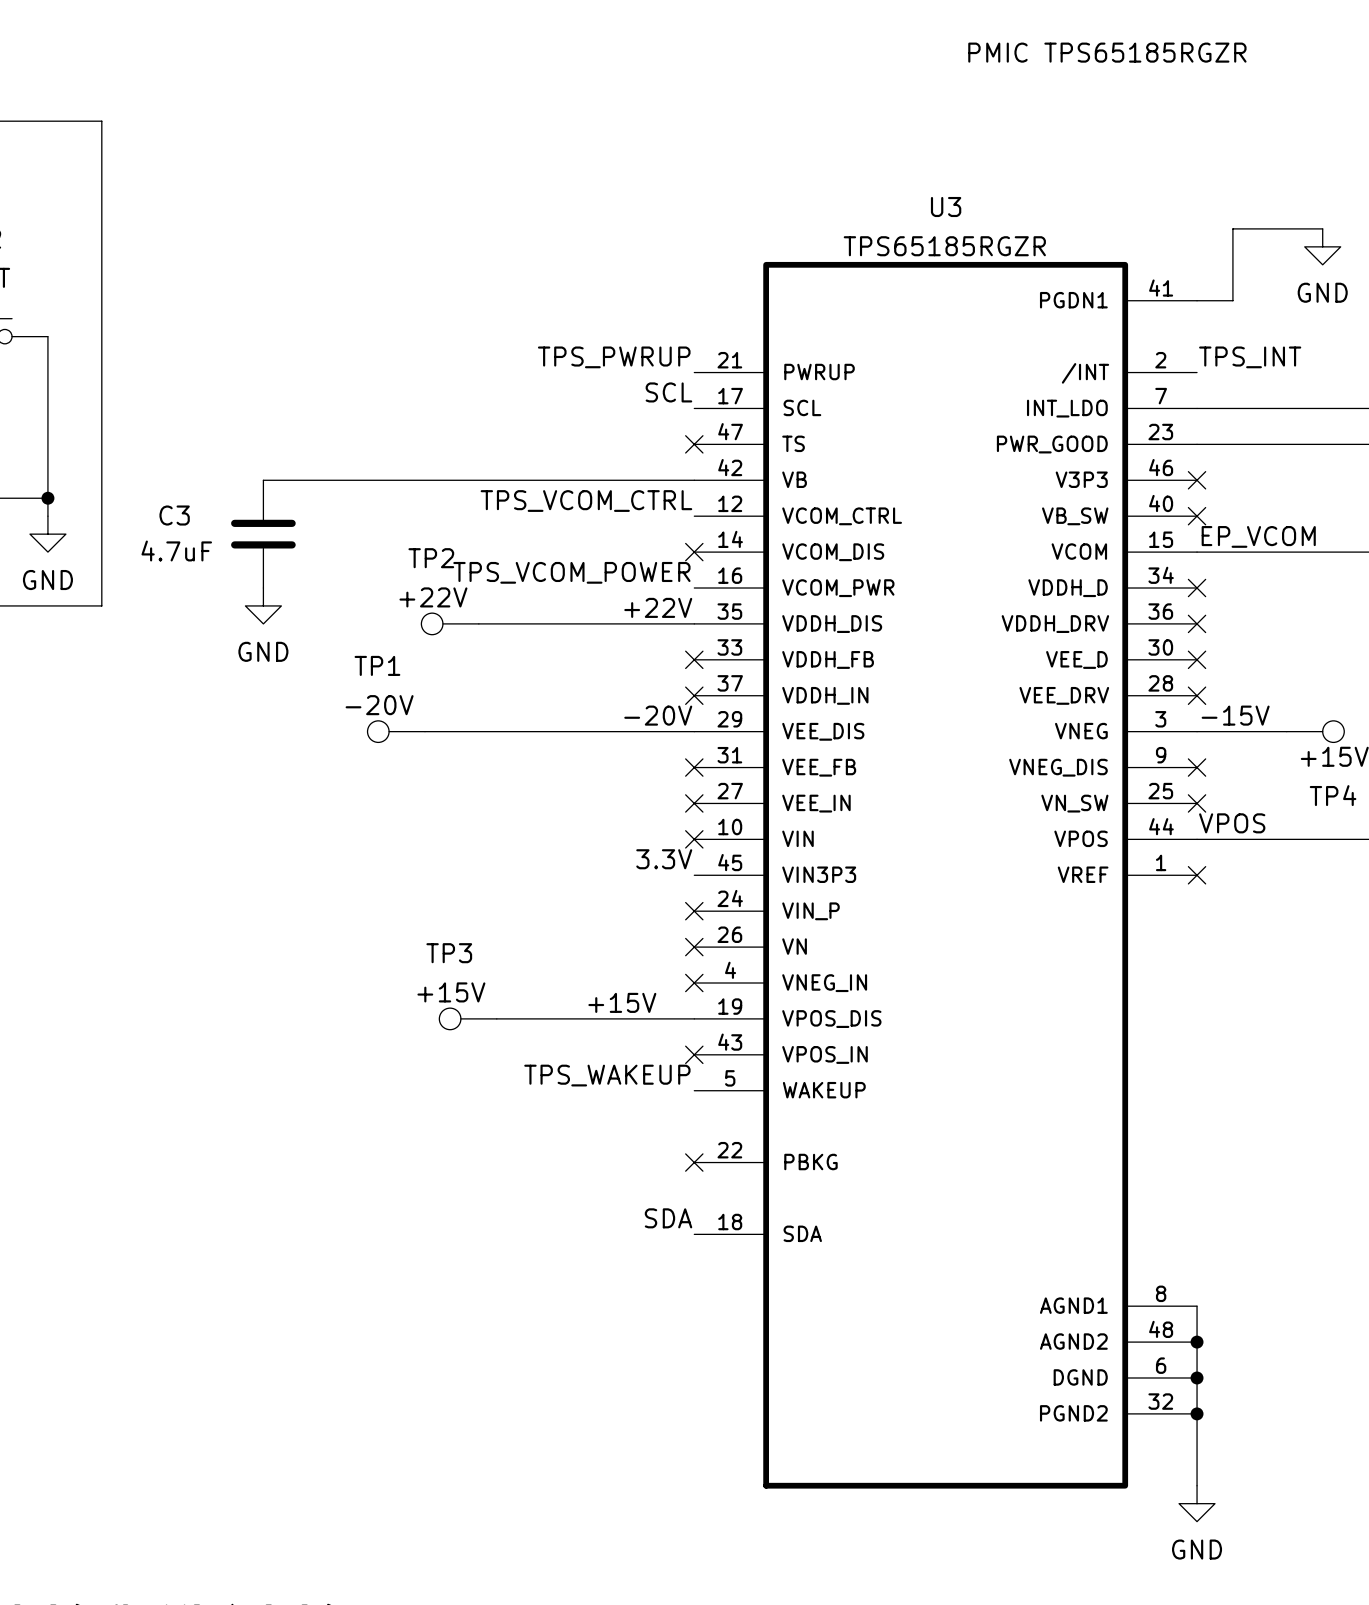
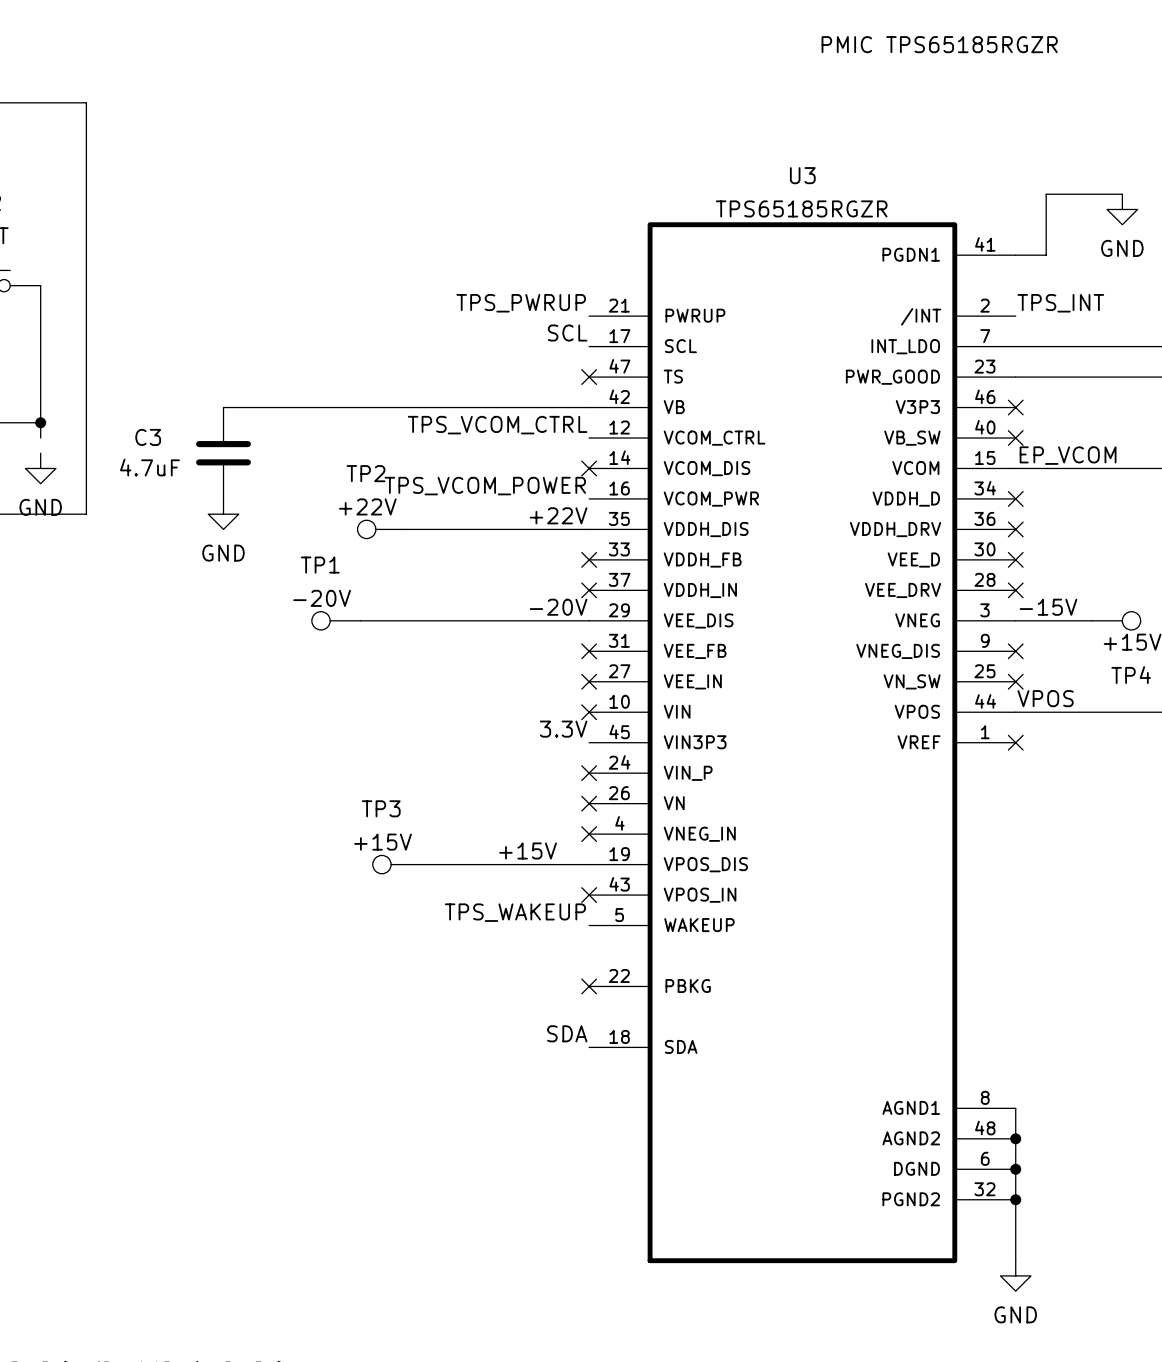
power symbol position: GND (47, 534) -> GND (40, 468)

